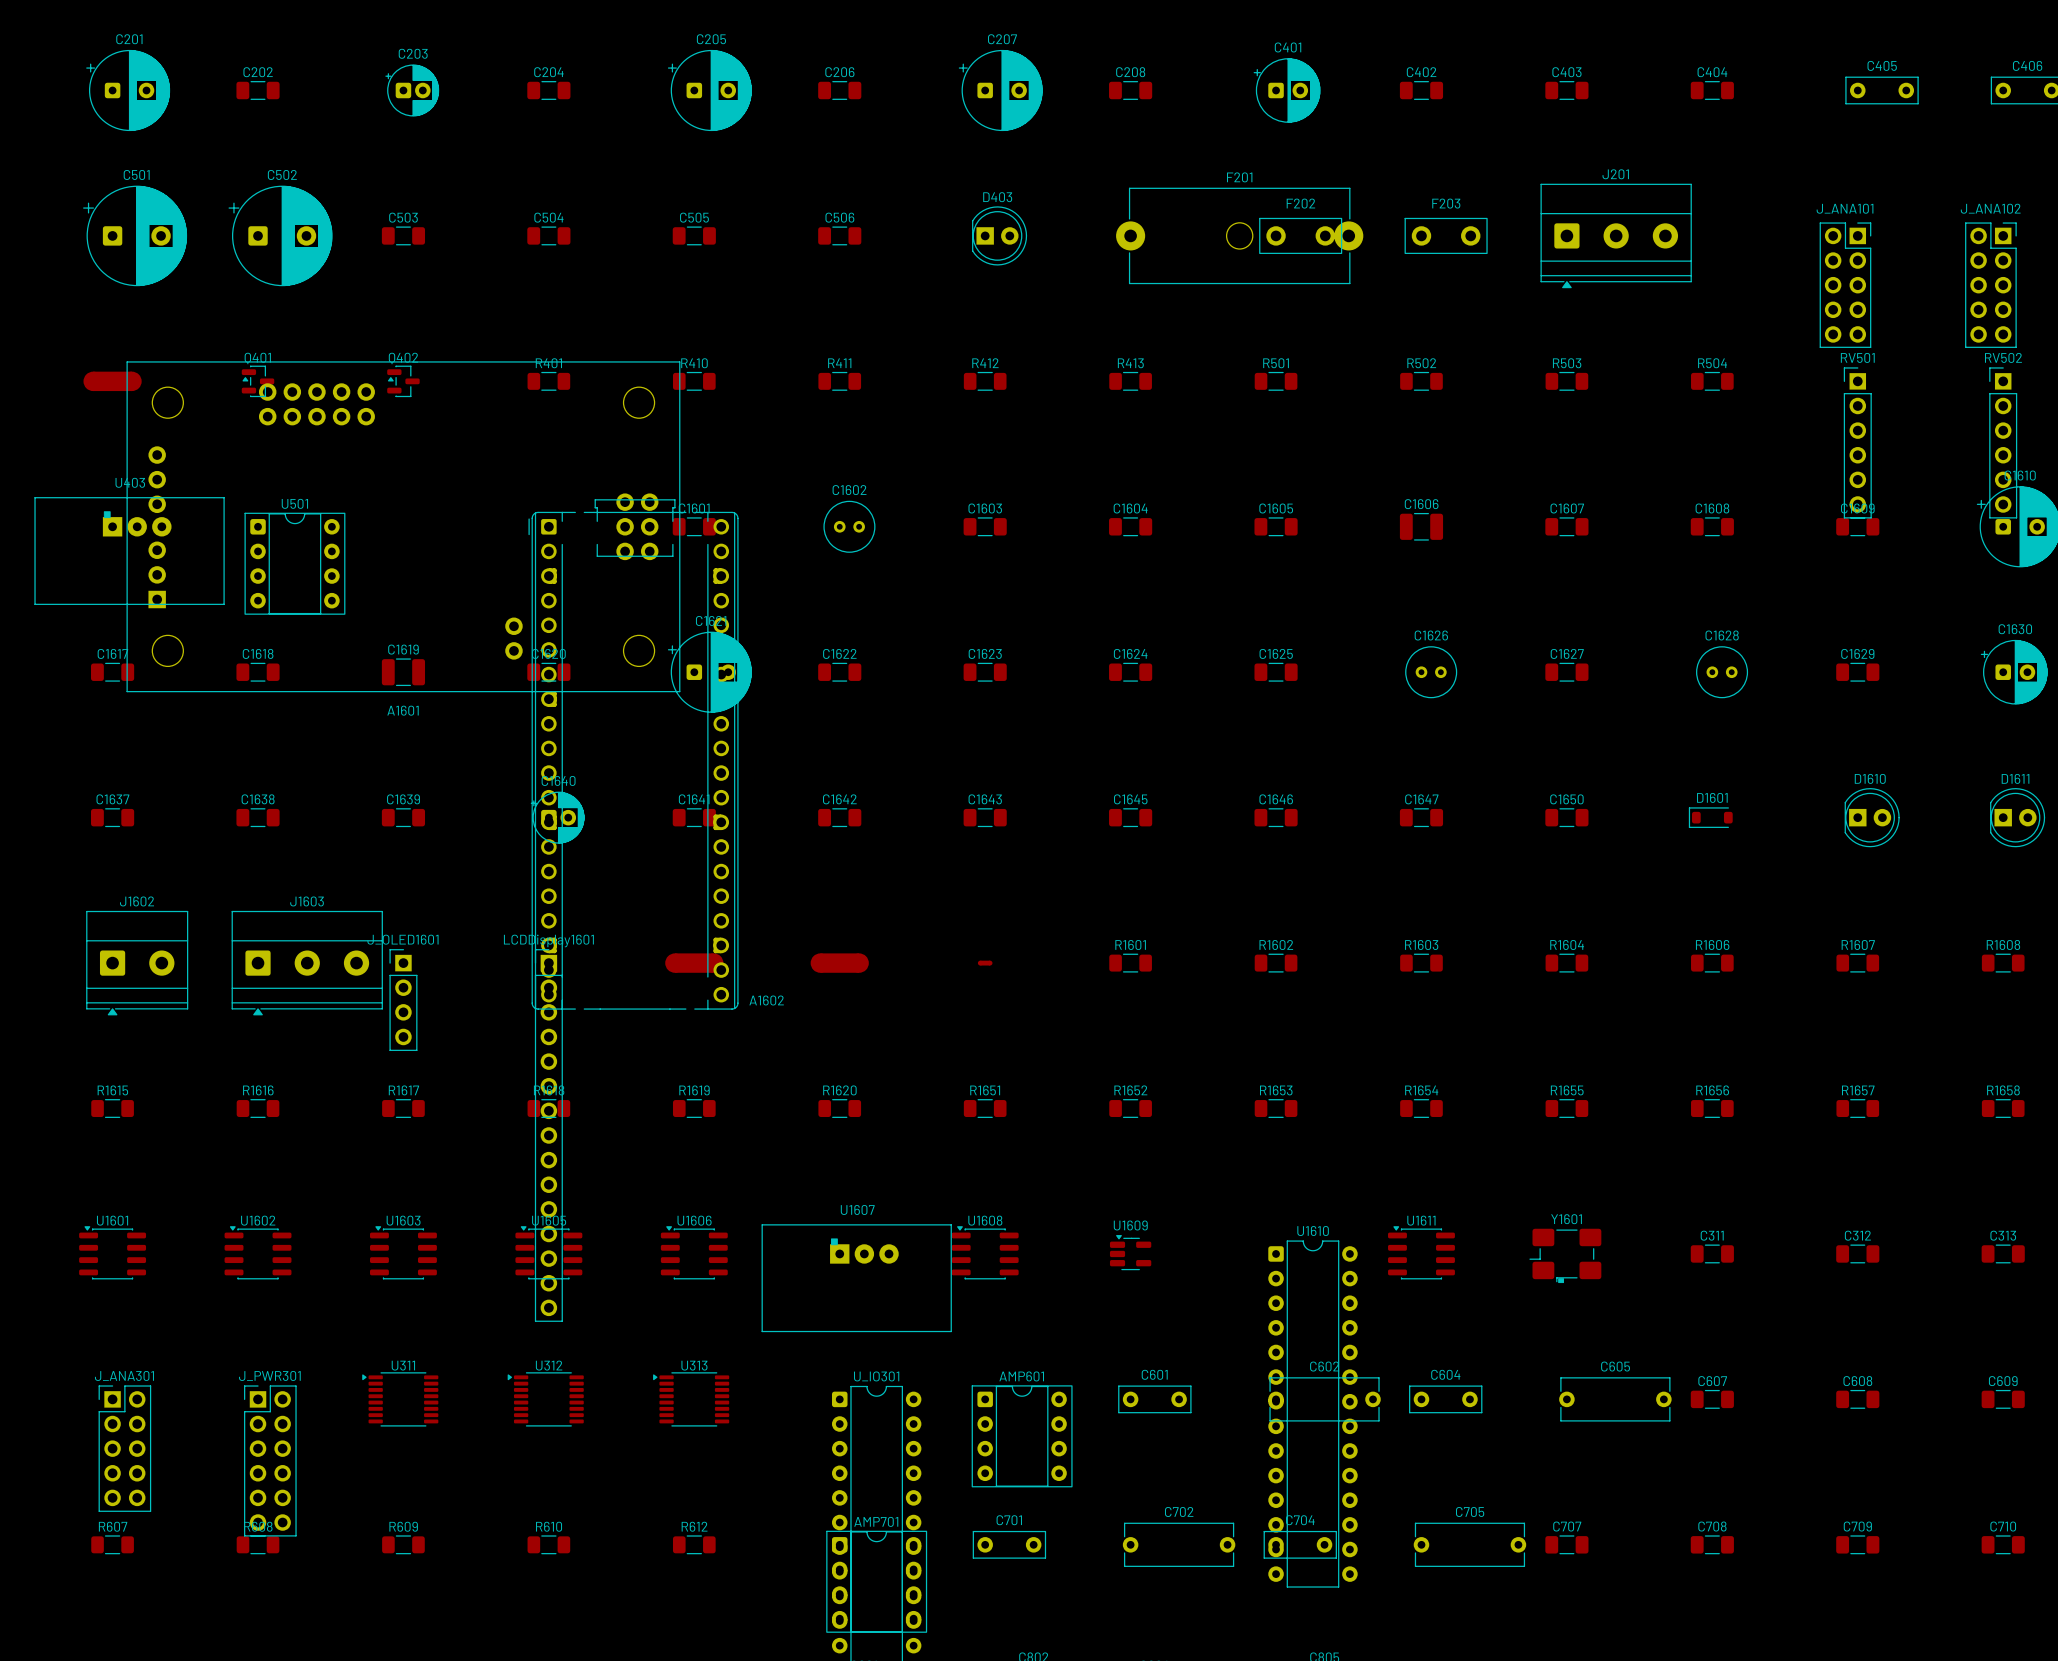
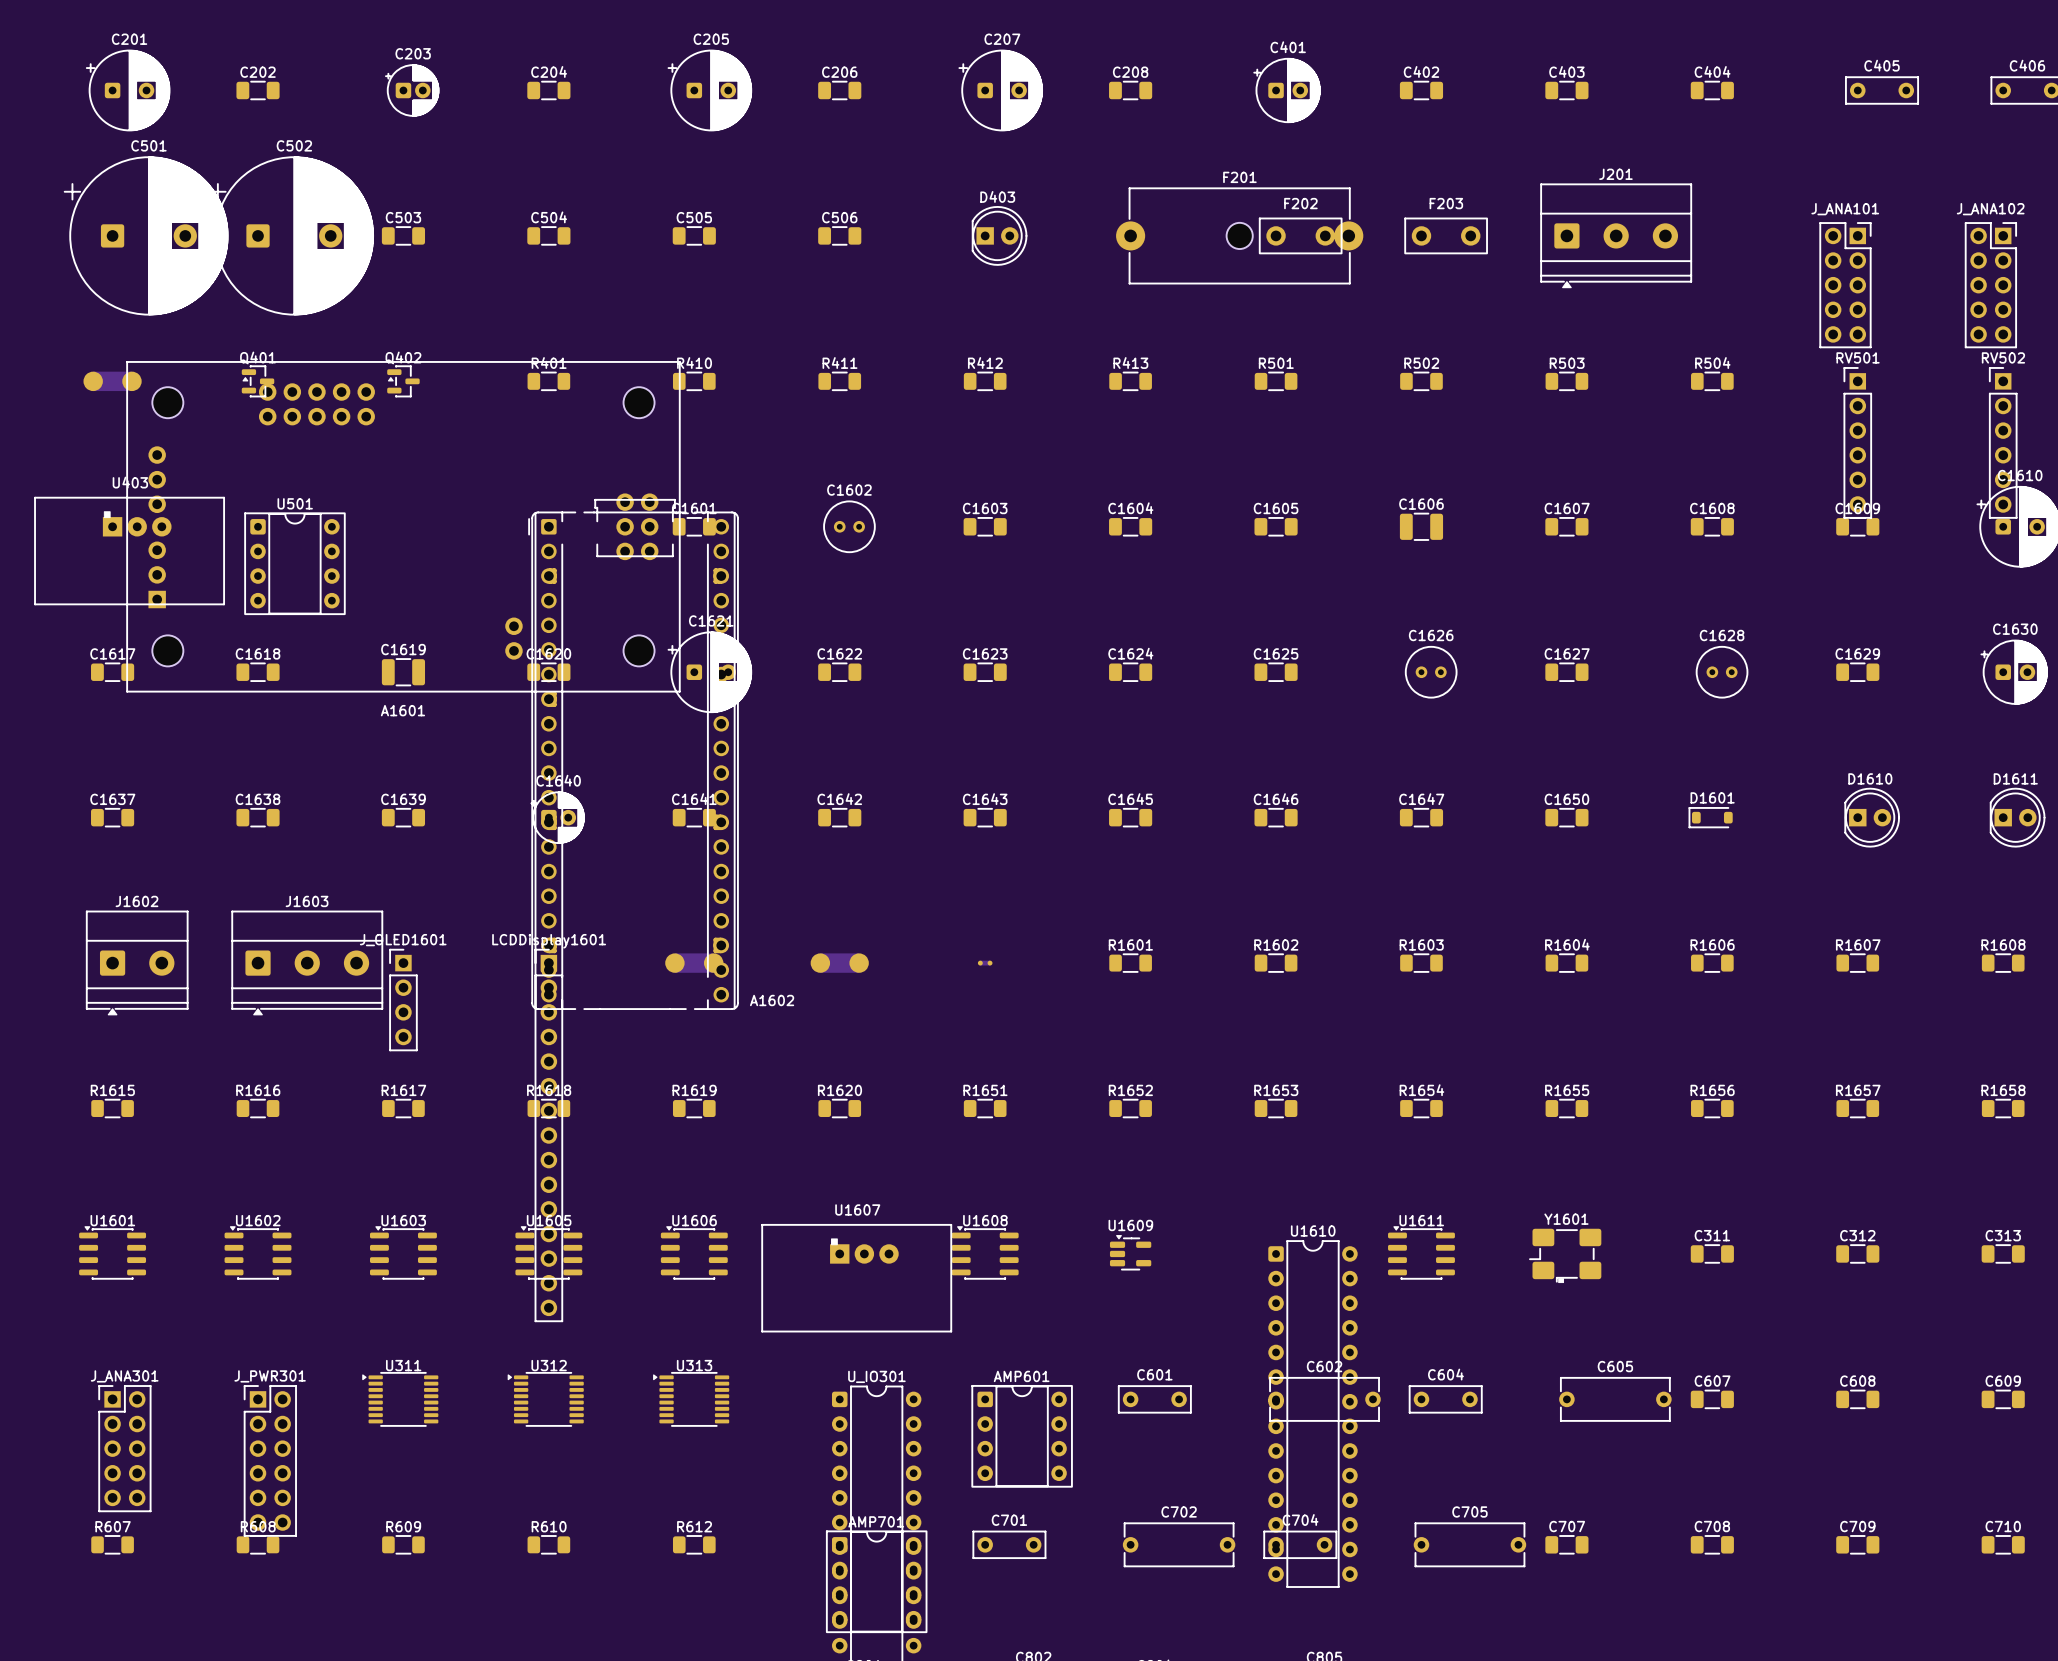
C501 name position: C501 (136, 174) -> C501 (148, 145)
C502 name position: C502 (282, 174) -> C502 (294, 145)
C501 footprint: [83, 185, 188, 287] -> [64, 156, 229, 316]
C502 footprint: [228, 185, 333, 287] -> [209, 156, 374, 316]

